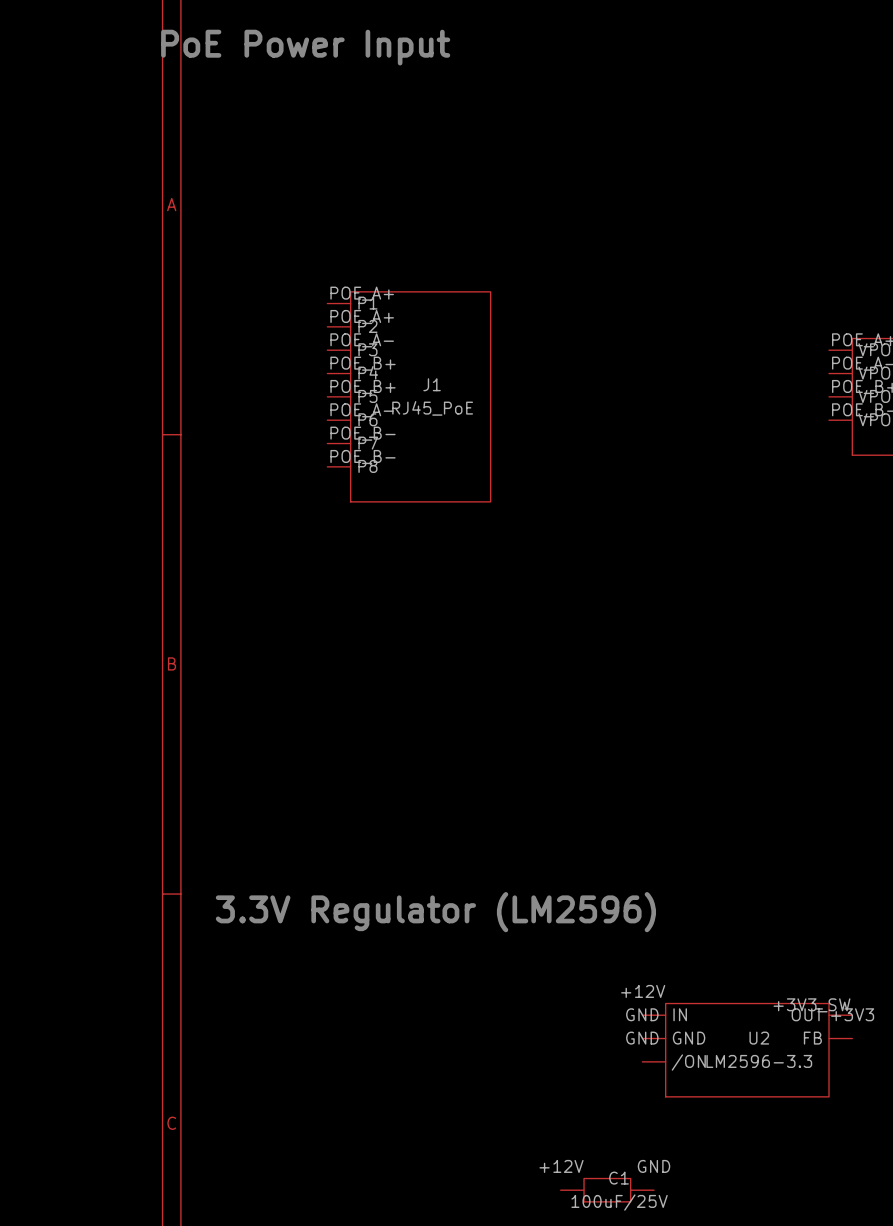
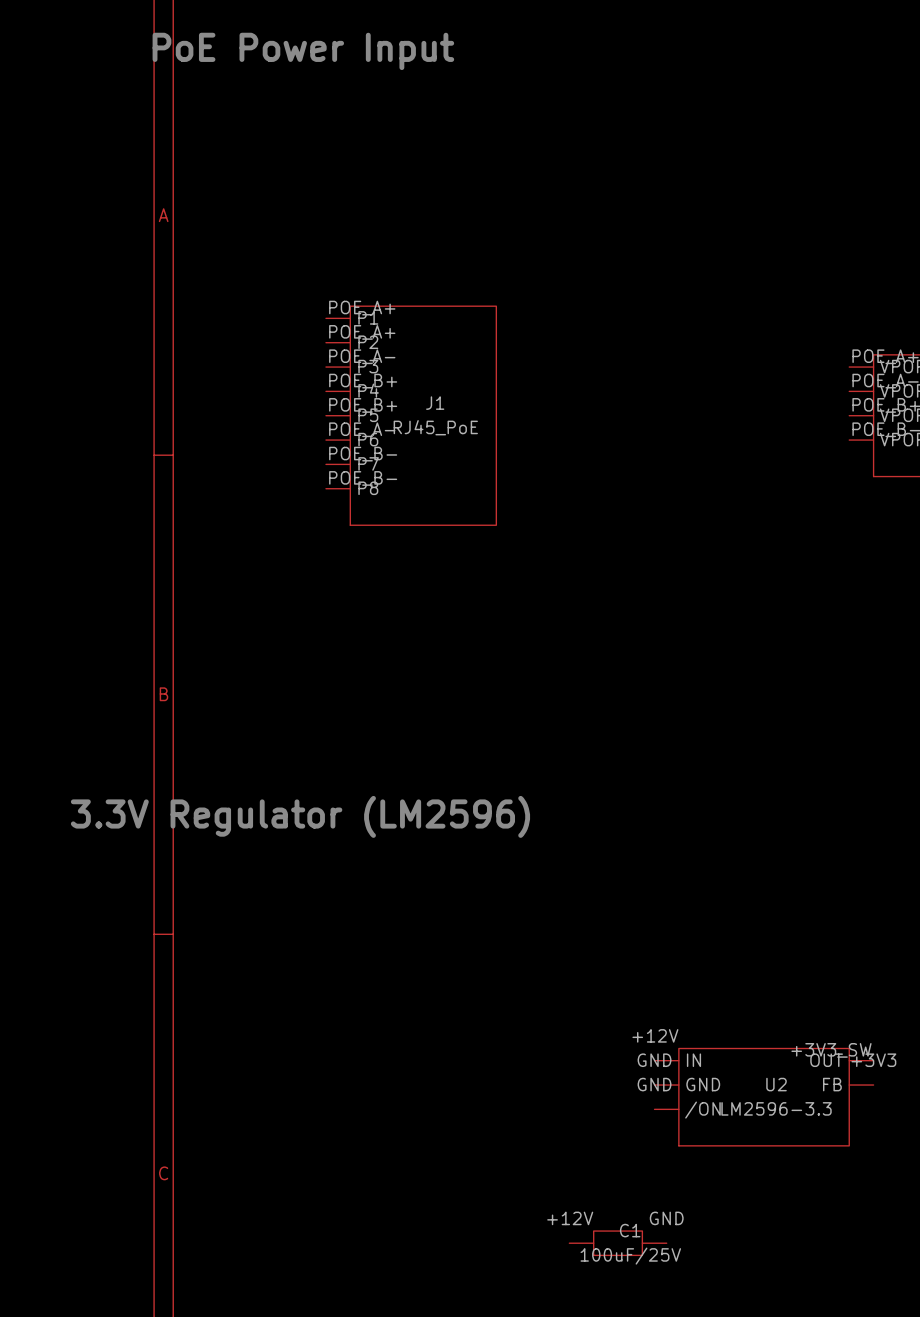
text position: 3.3V Regulator (LM2596) (435, 912) -> 3.3V Regulator (LM2596) (300, 816)

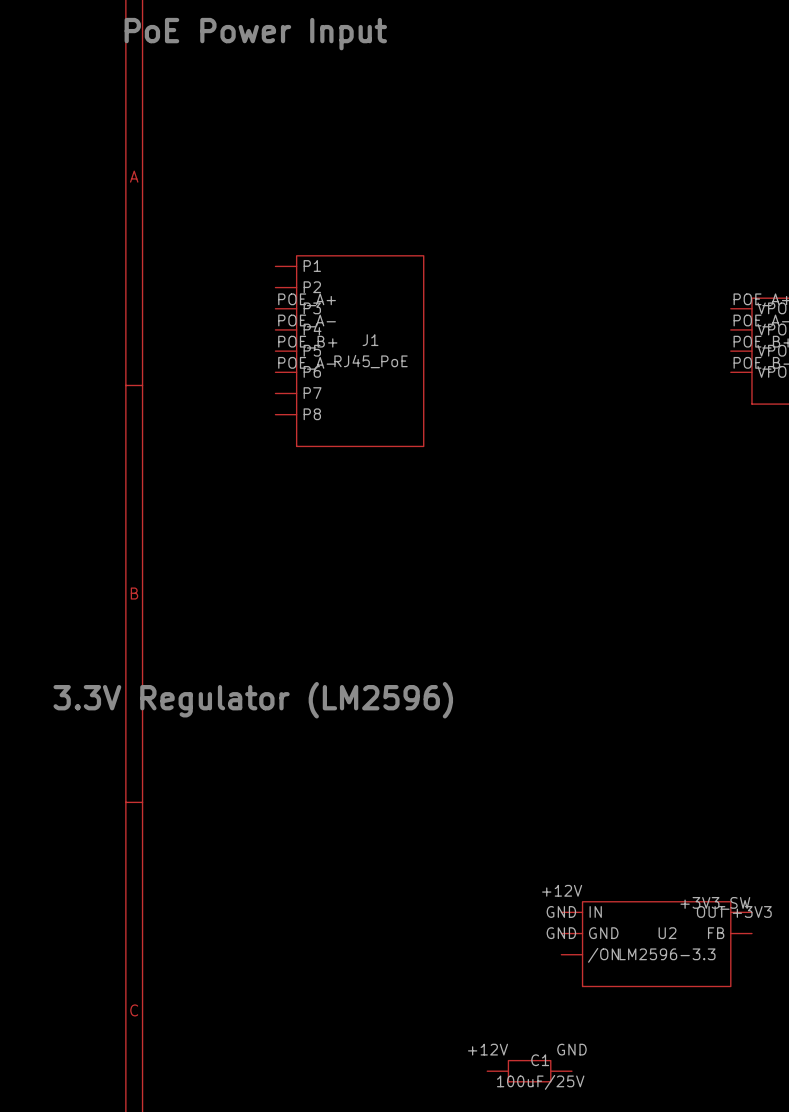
label: POE_A+ (362, 308) -> none
label: POE_A+ (362, 332) -> none
label: POE_A- (362, 356) -> POE_A+ (307, 299)
label: POE_B+ (363, 381) -> POE_A- (307, 321)
label: POE_B- (363, 454) -> none
label: POE_B- (363, 478) -> none

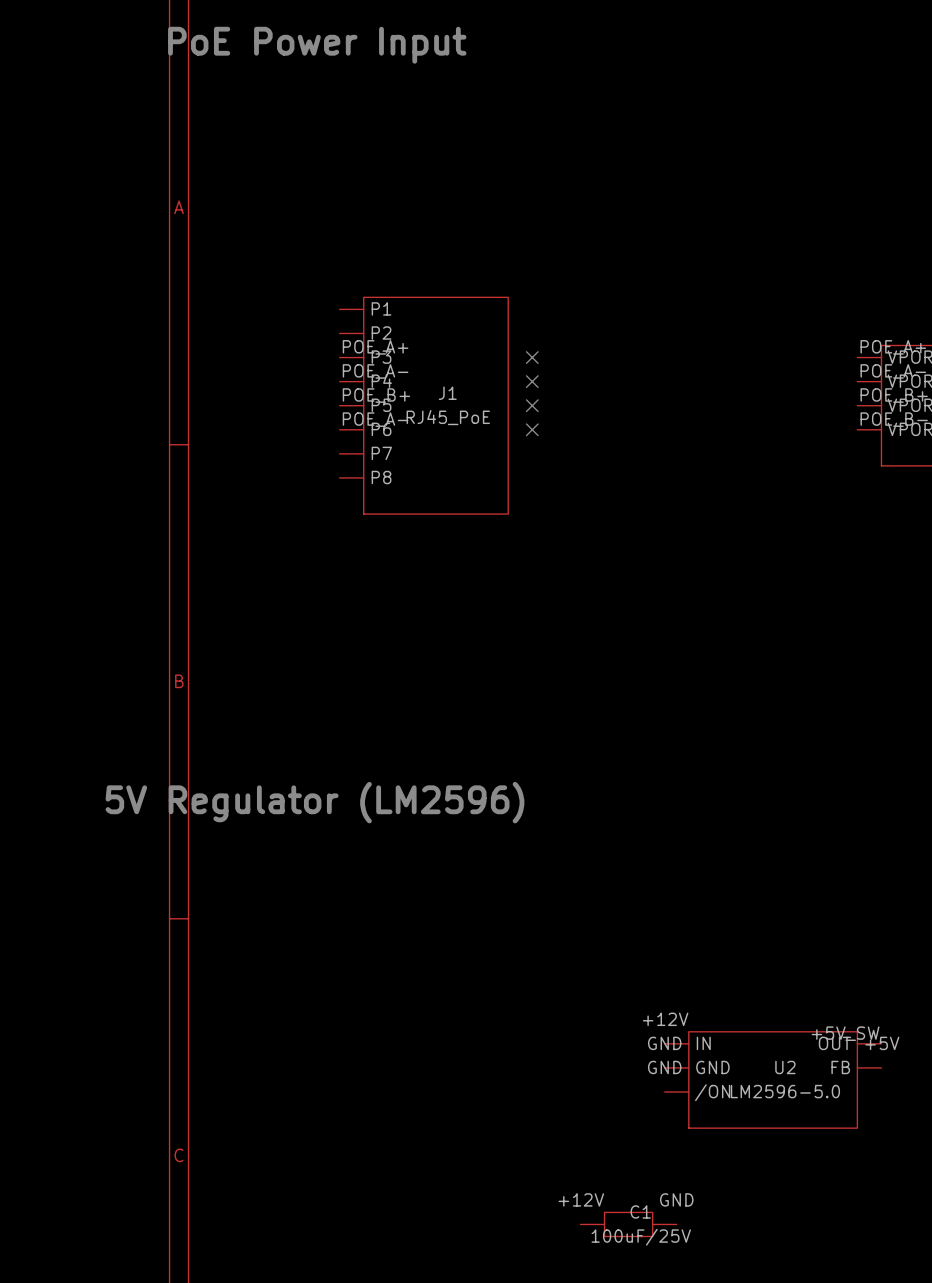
no-connect mark: none -> (532, 357)
no-connect mark: none -> (532, 381)
no-connect mark: none -> (532, 405)
no-connect mark: none -> (532, 429)
text: 3.3V Regulator (LM2596) (253, 700) -> 5V Regulator (LM2596) (314, 802)
label: +3V3_SW (715, 903) -> +5V_SW (845, 1033)
power symbol: +3V3 (752, 911) -> +5V (882, 1043)
U2 value: LM2596-3.3 (667, 954) -> LM2596-5.0 (785, 1091)

